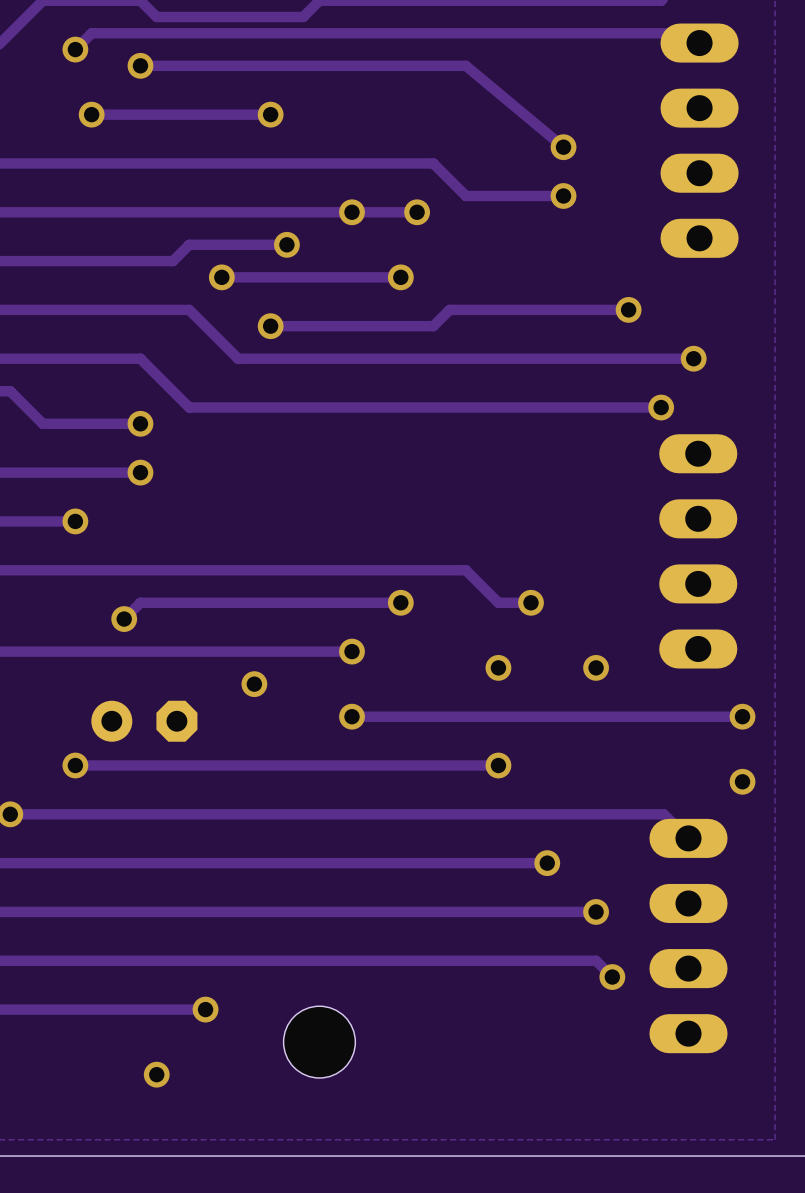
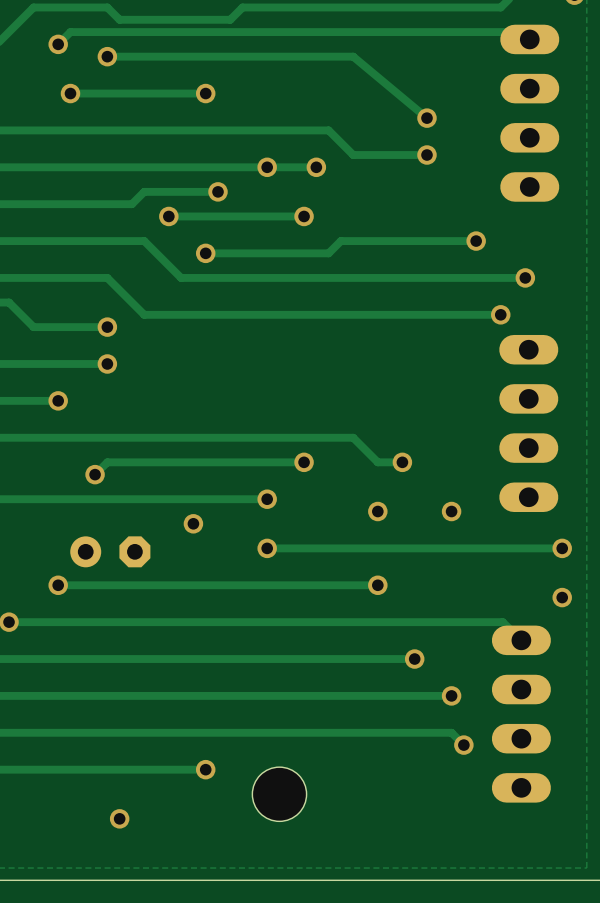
via position: (205, 1009) -> (205, 769)
track: none -> (205, 769) (156, 769)
hole position: (319, 1042) -> (279, 794)

